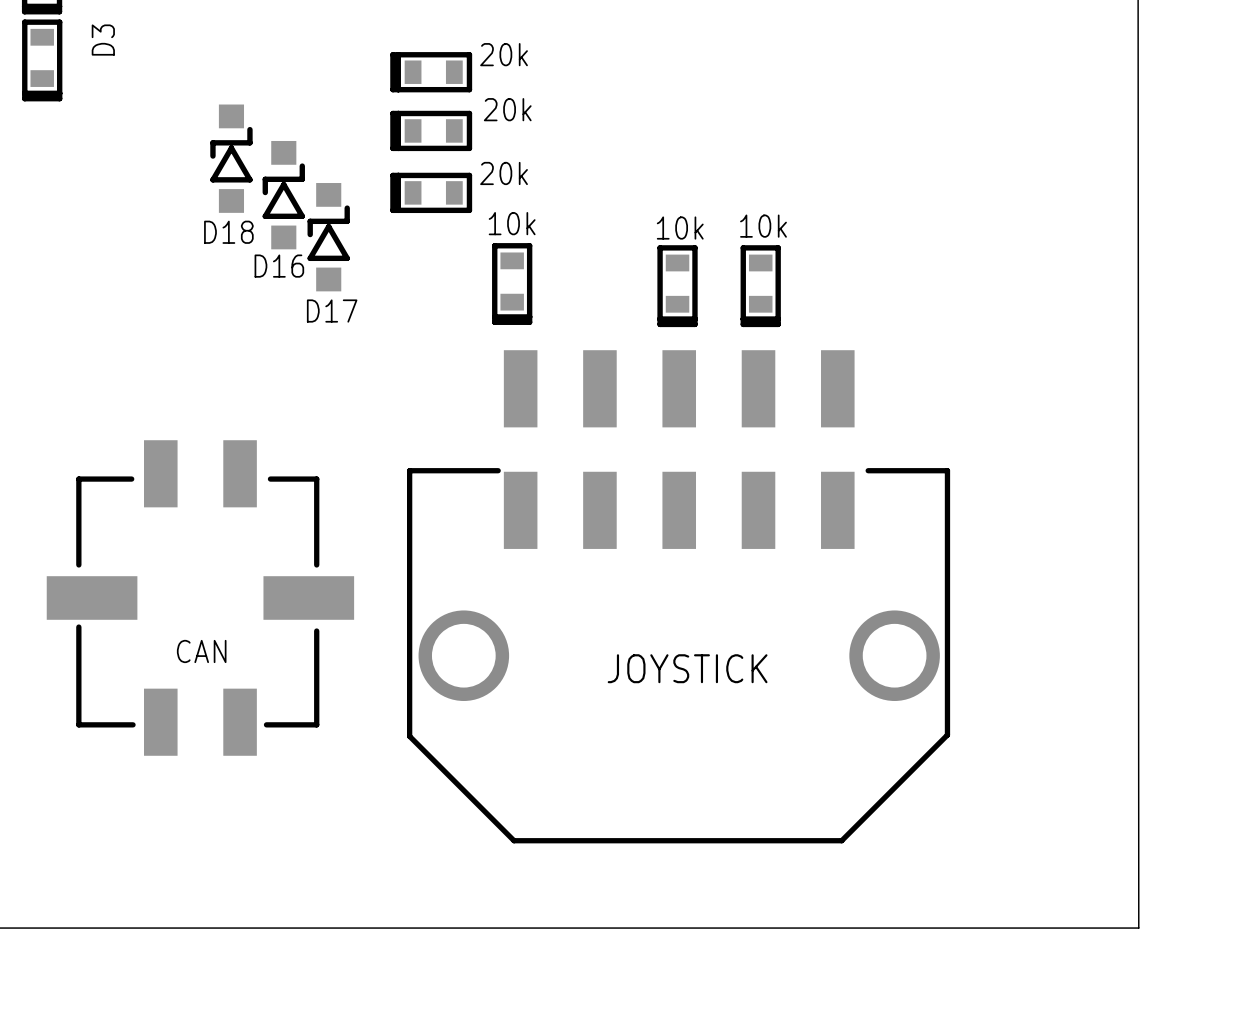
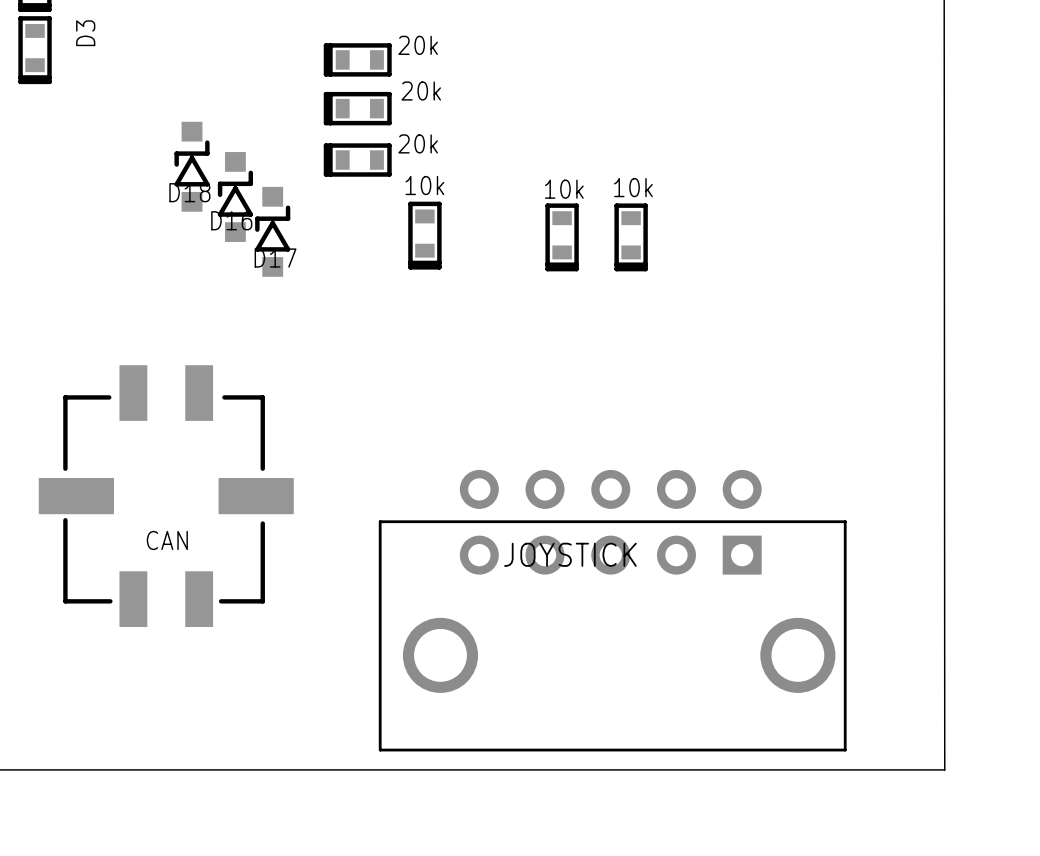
D18 position: (231, 158) -> (192, 166)
D16 position: (283, 195) -> (235, 196)
D17 position: (328, 237) -> (272, 231)
part: JOYSTICK (678, 596) -> none
part: none -> JOYSTICK (612, 610)

